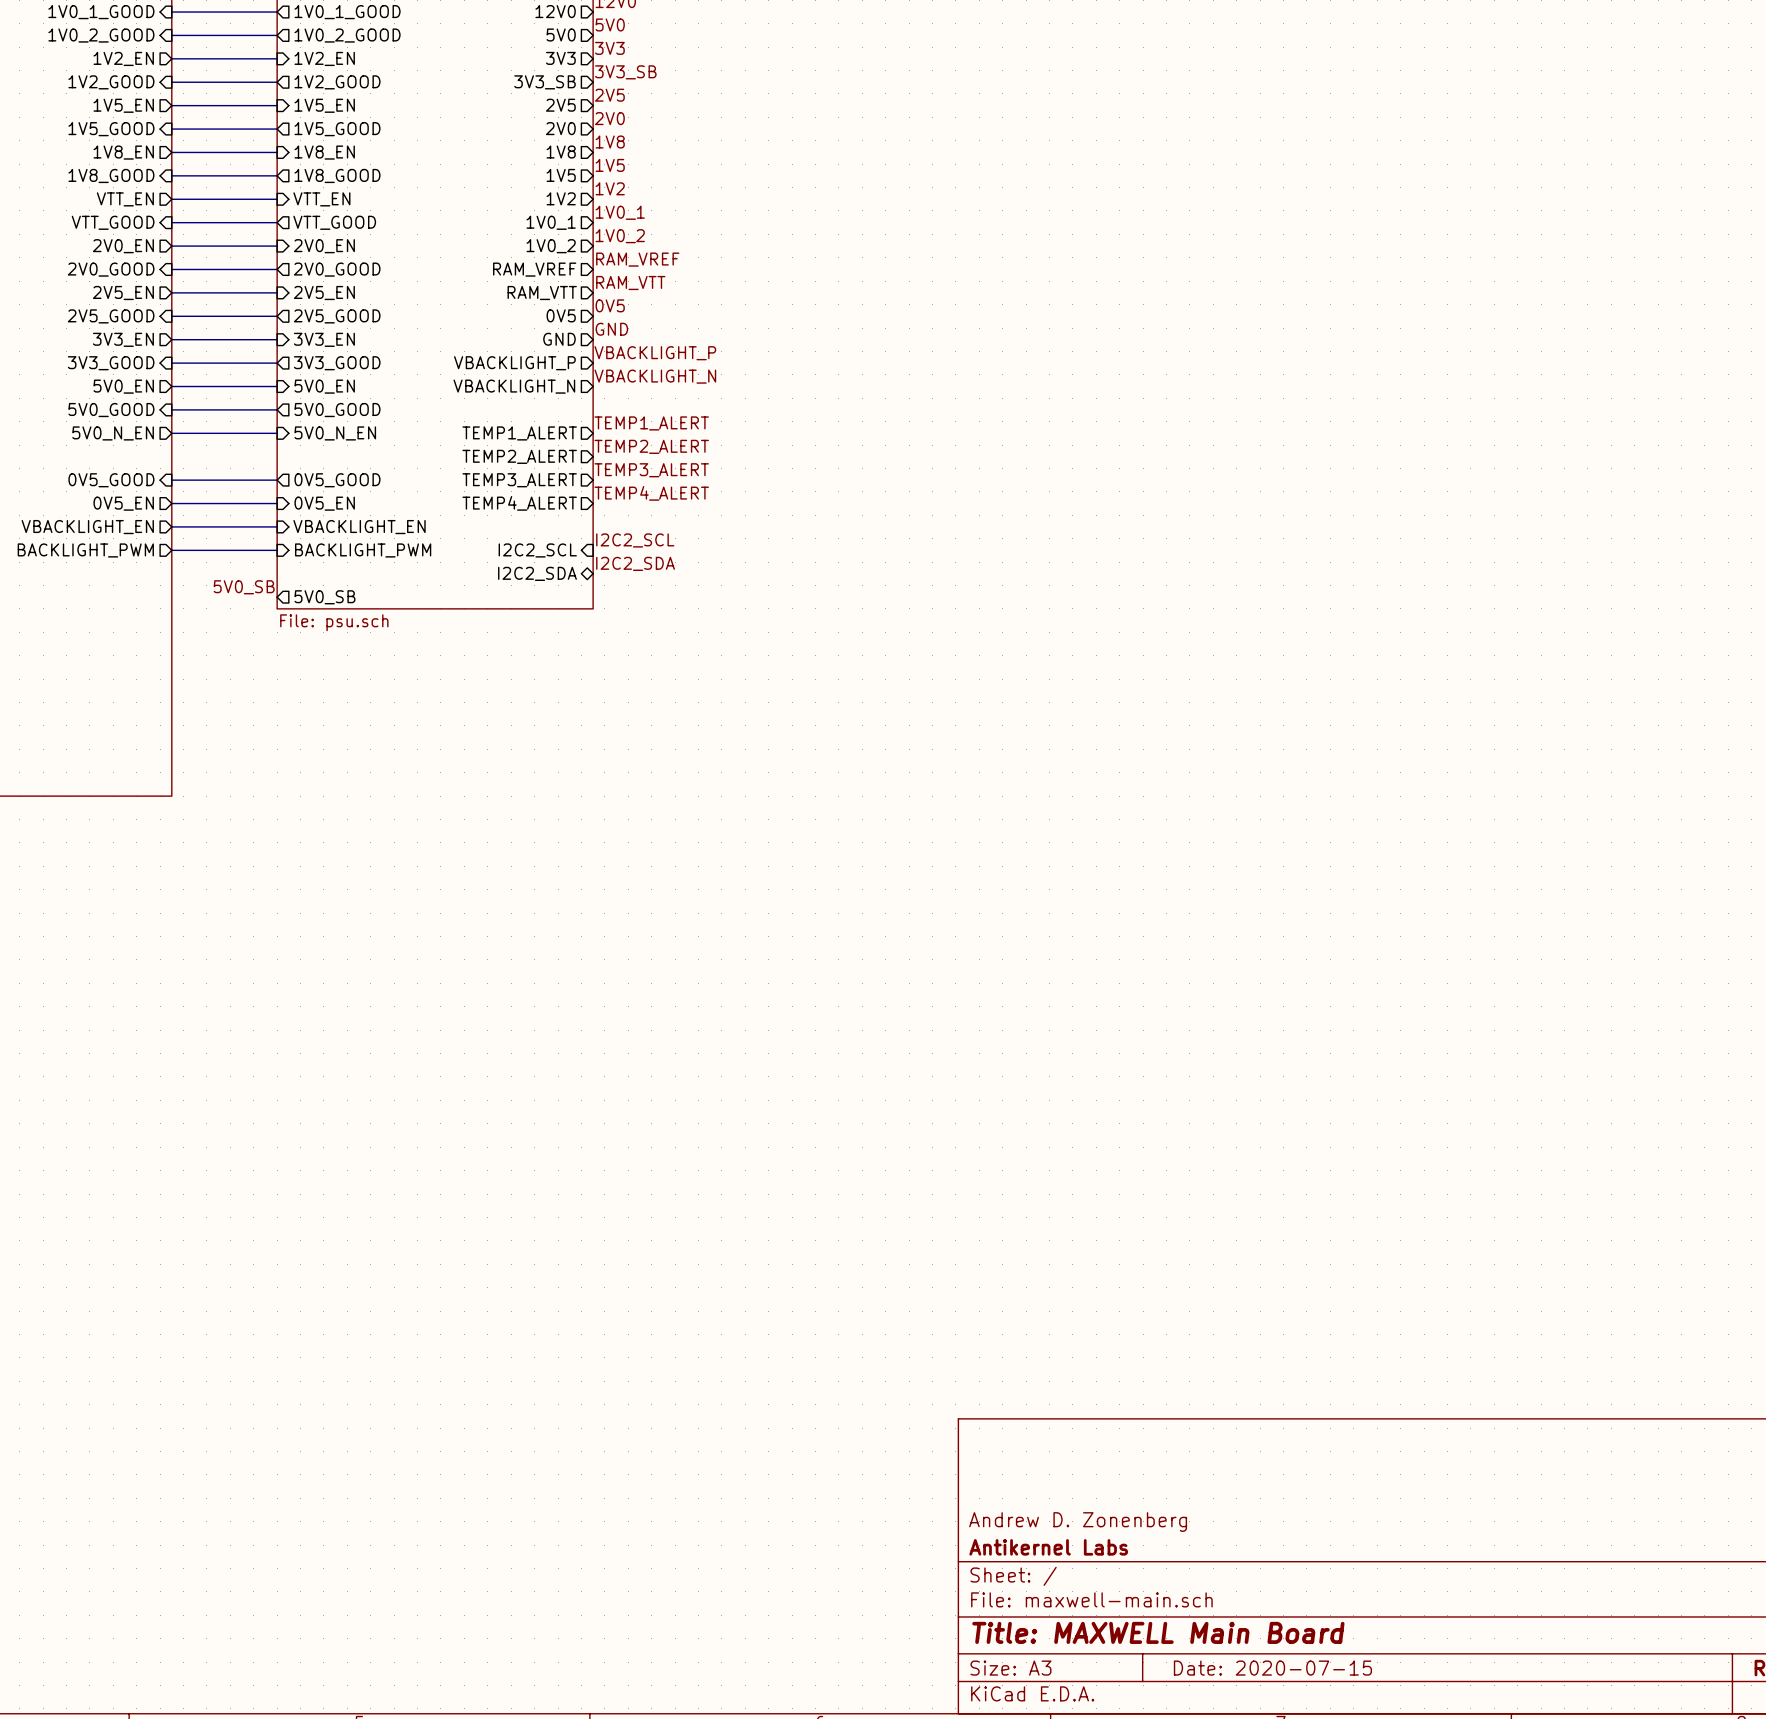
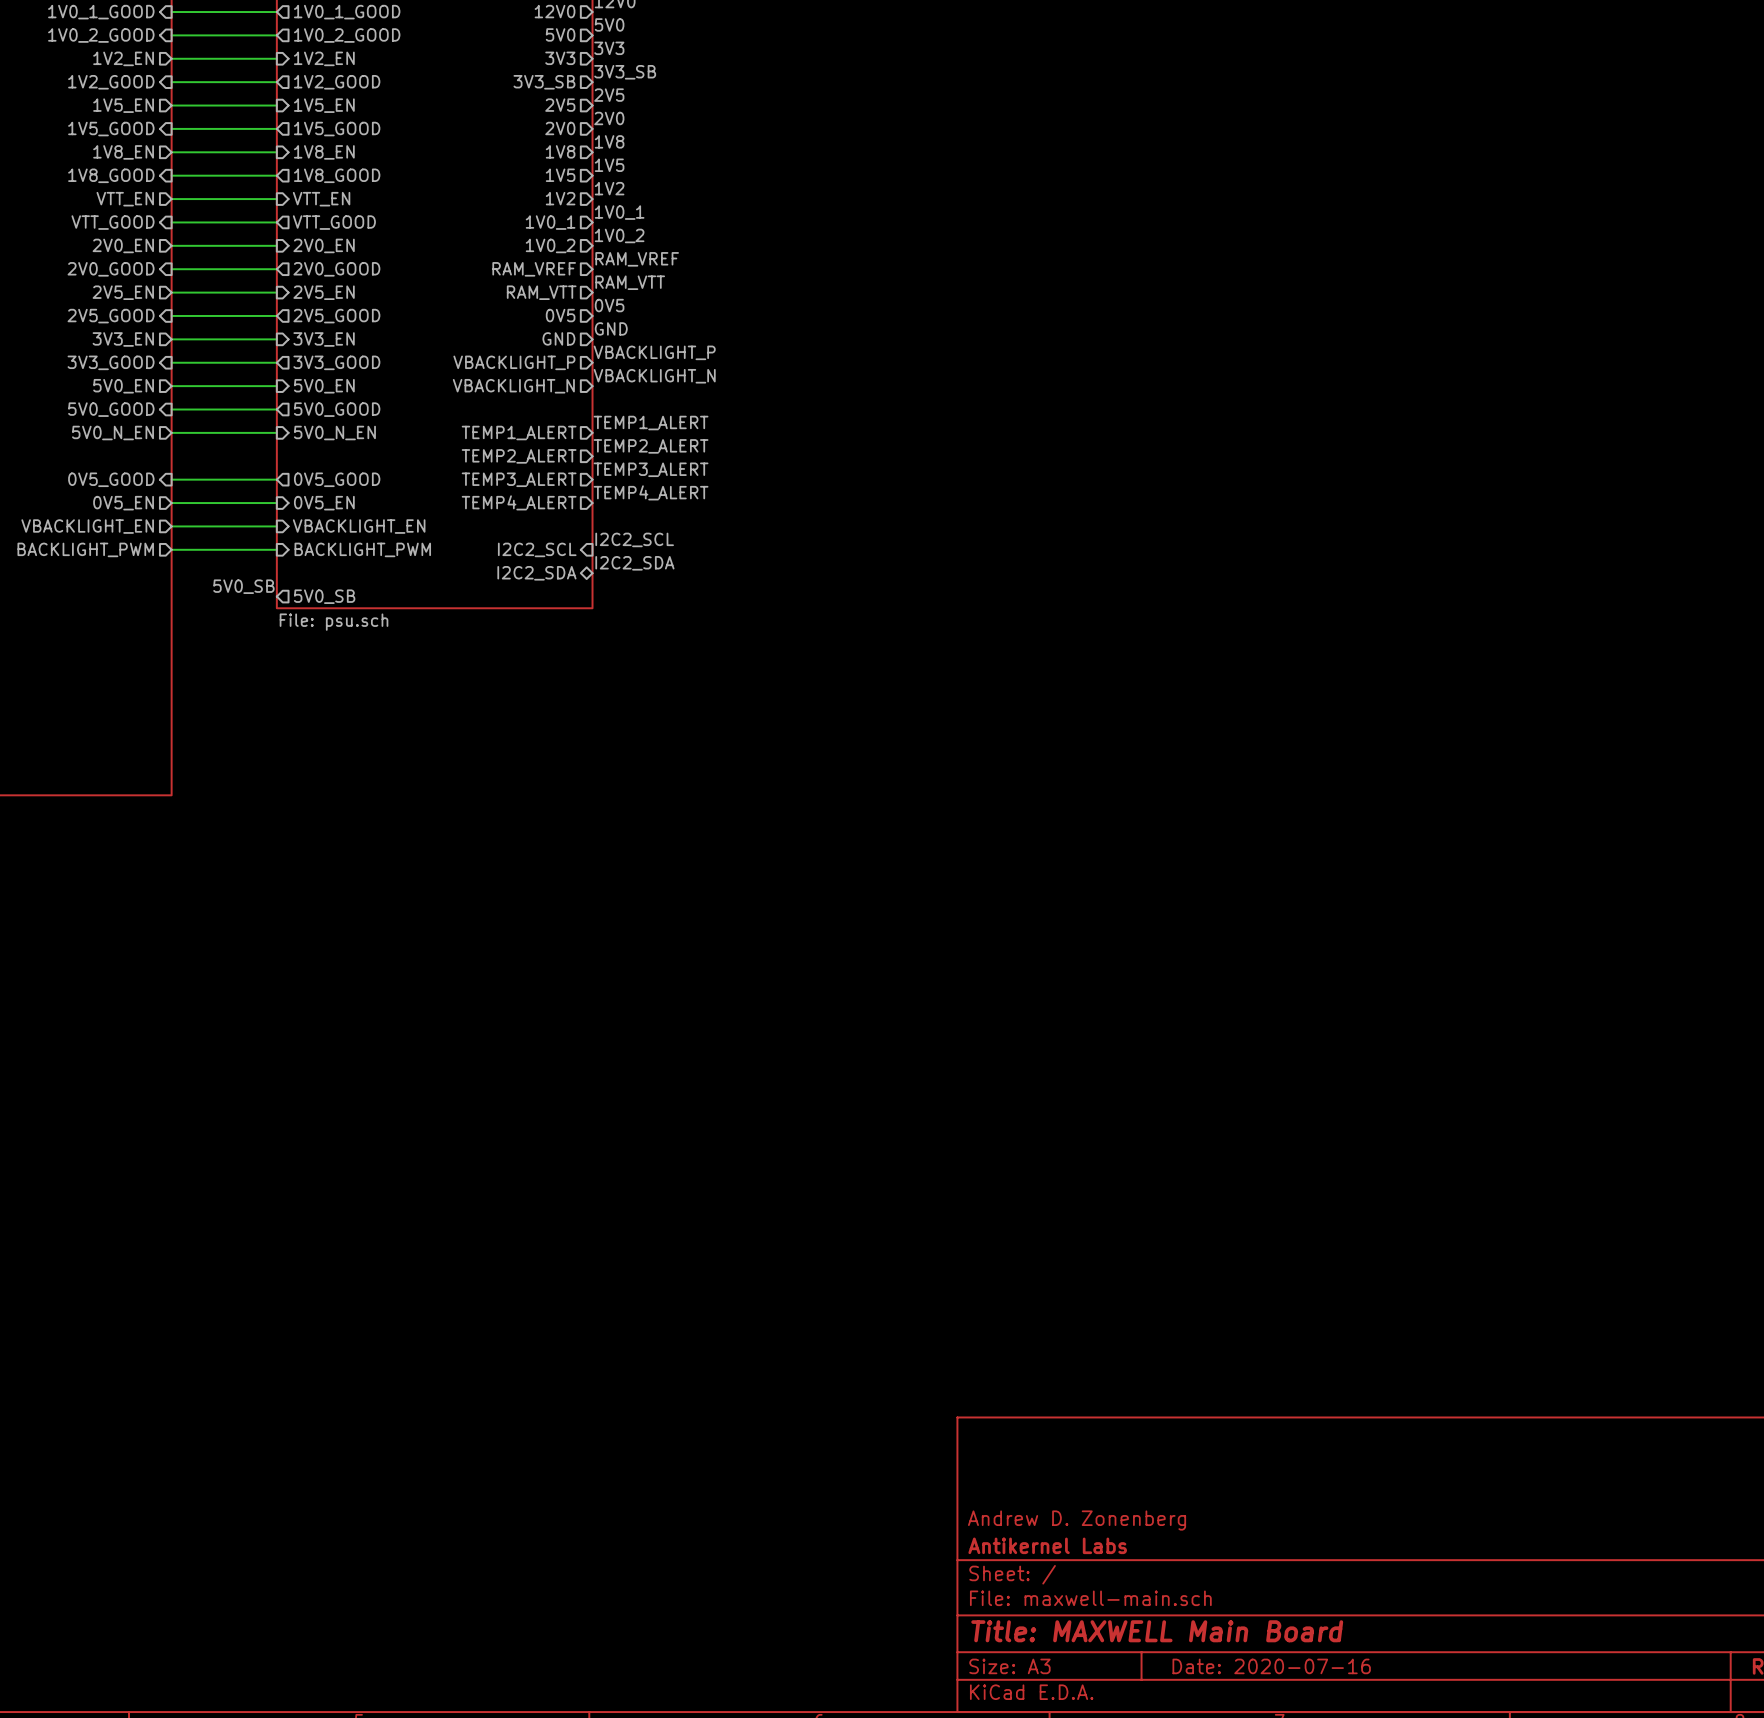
title block: Date: 2020-07-15 (1272, 1668) -> Date: 2020-07-16 (1271, 1666)

